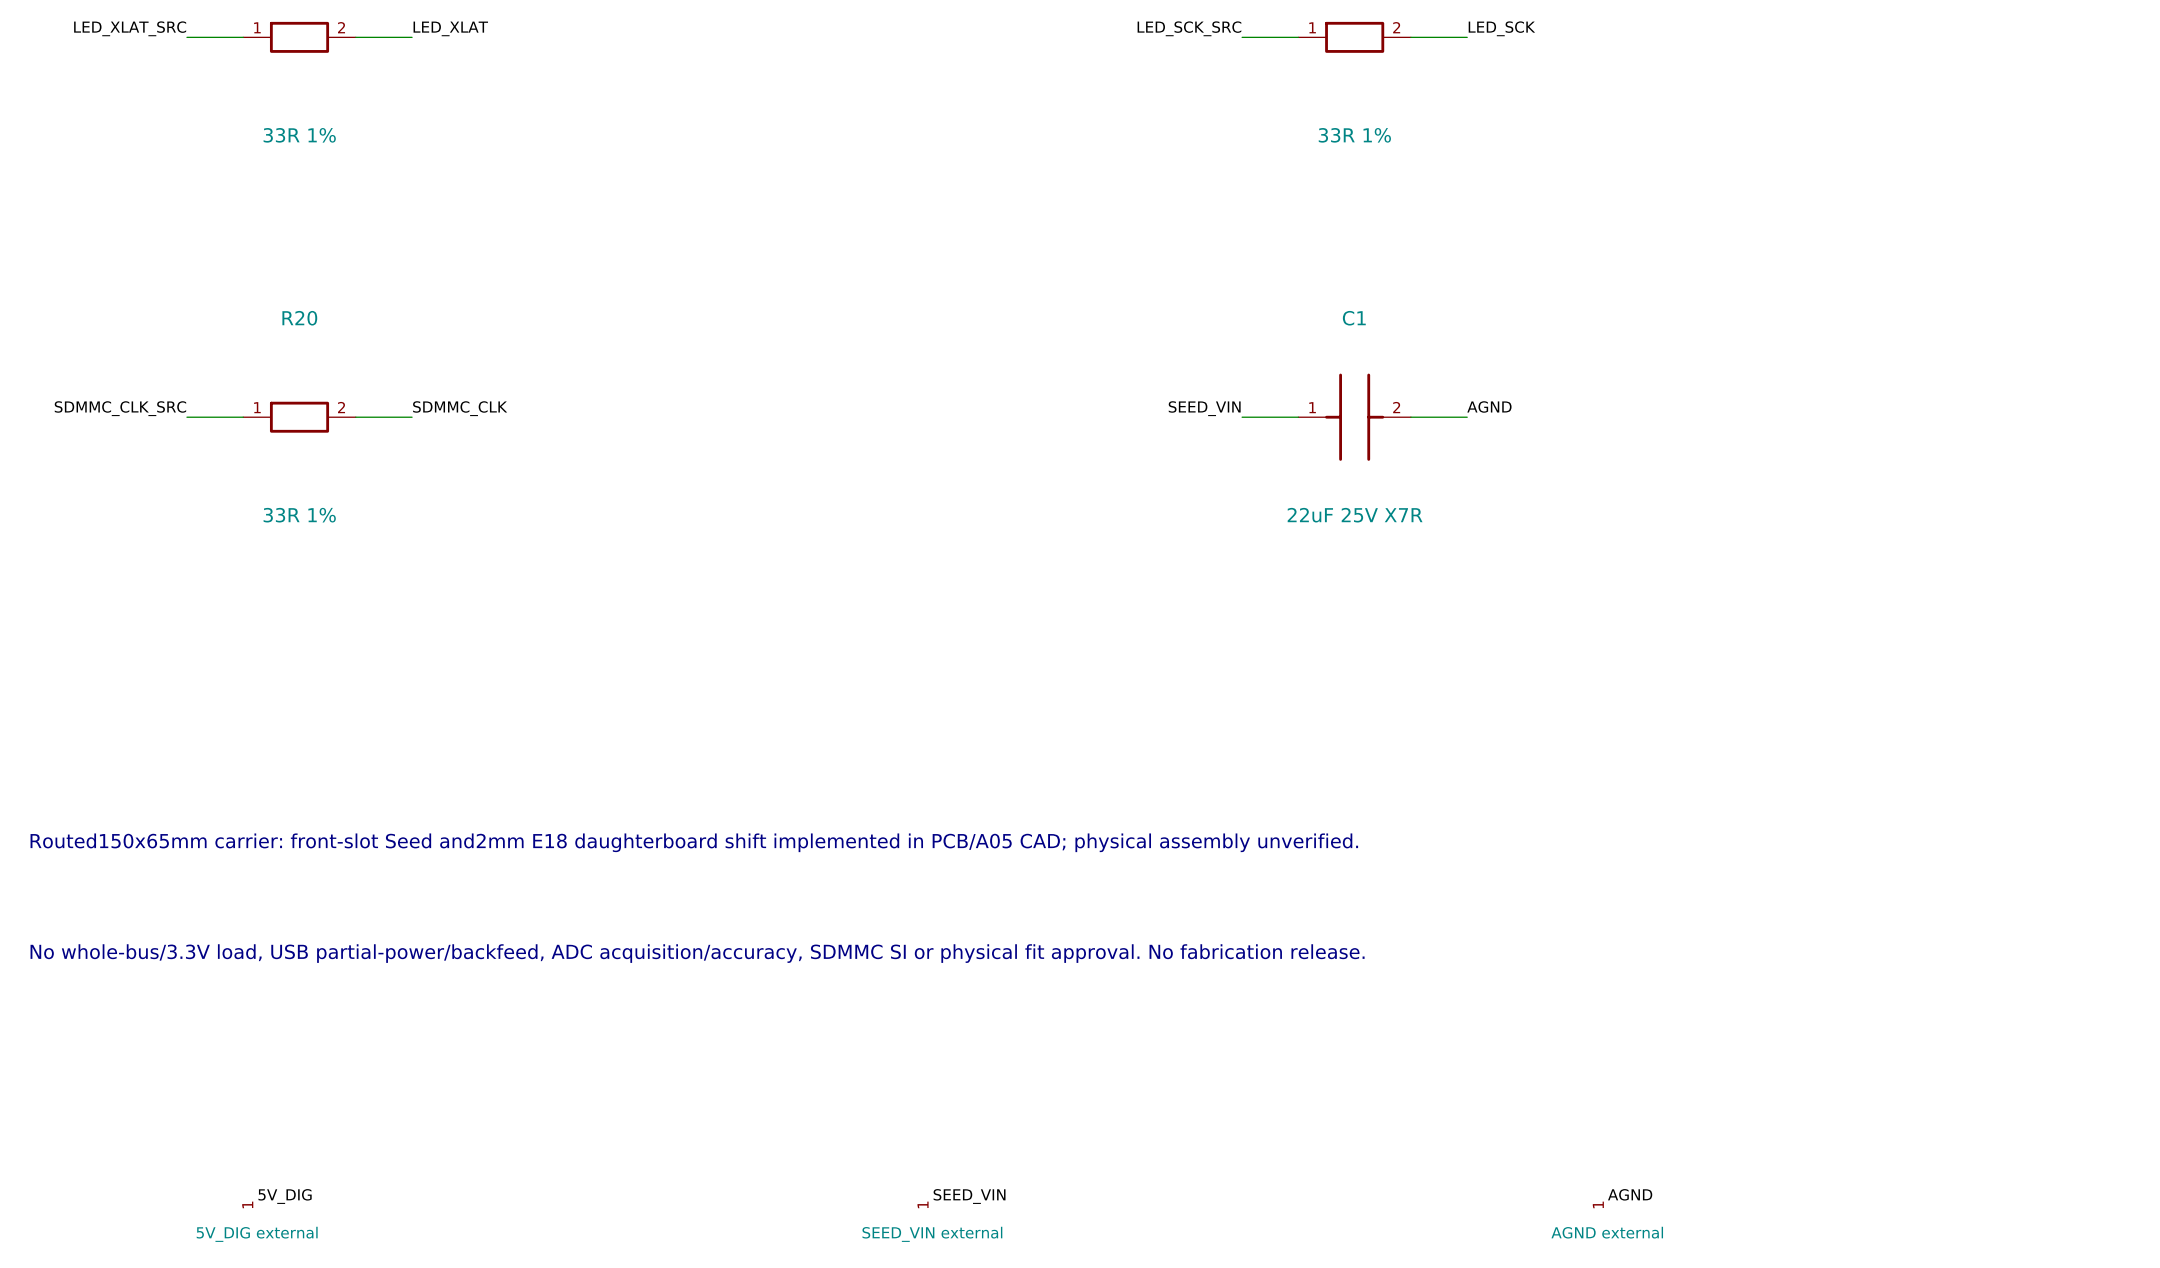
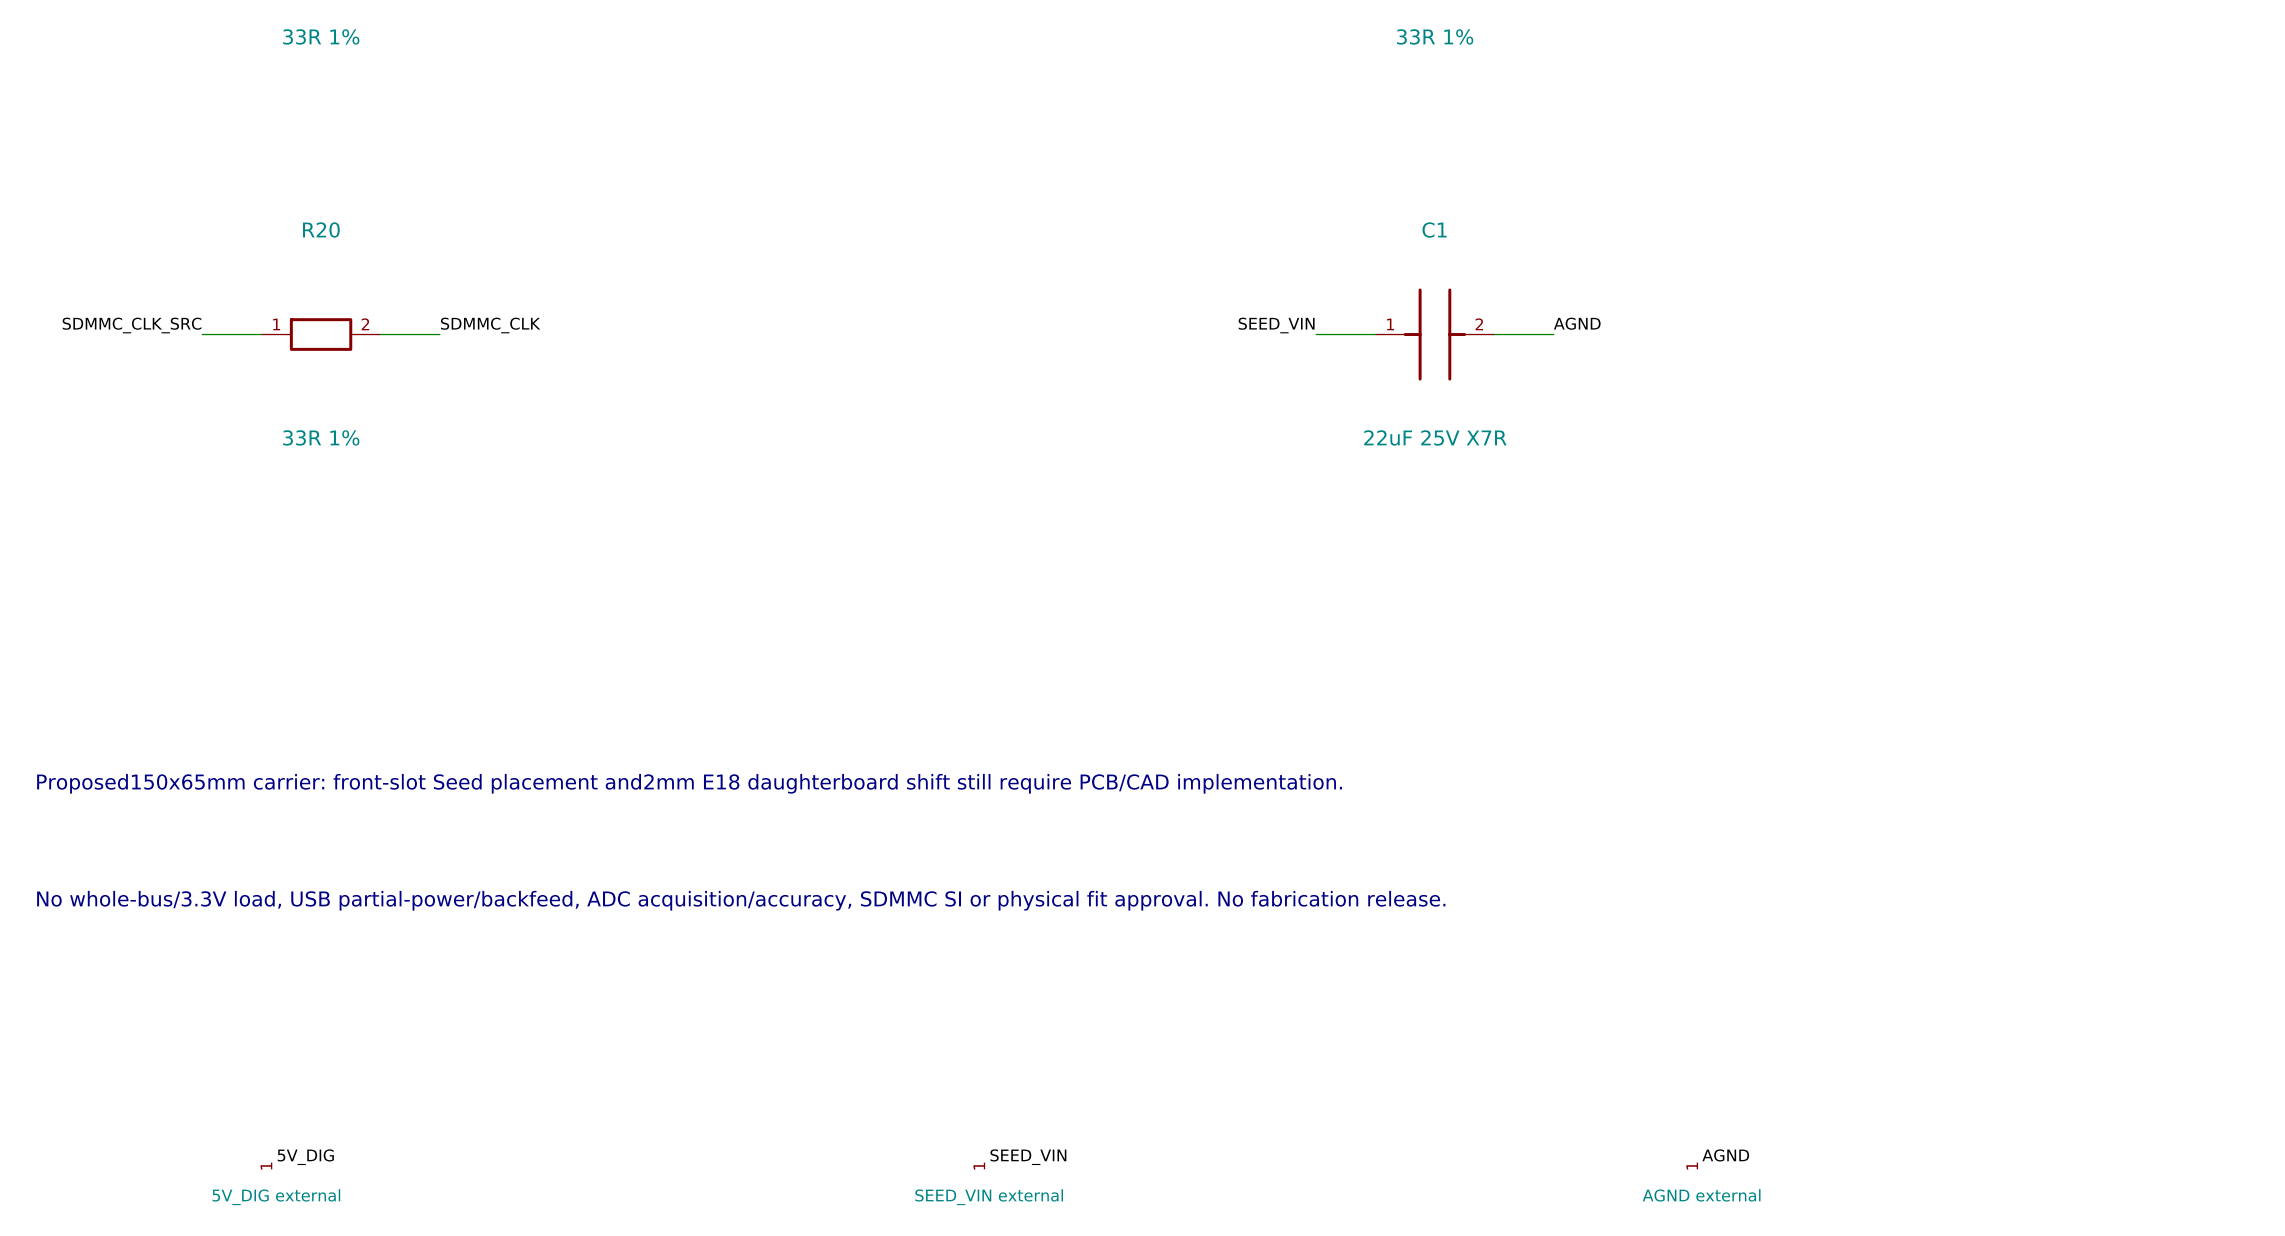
text: Routed150x65mm carrier: front-slot Seed and2mm E18 daughterboard shift implemented in PCB/A05 CAD; physical assembly unverified. (694, 842) -> Proposed150x65mm carrier: front-slot Seed placement and2mm E18 daughterboard shift still require PCB/CAD implementation. (689, 783)

